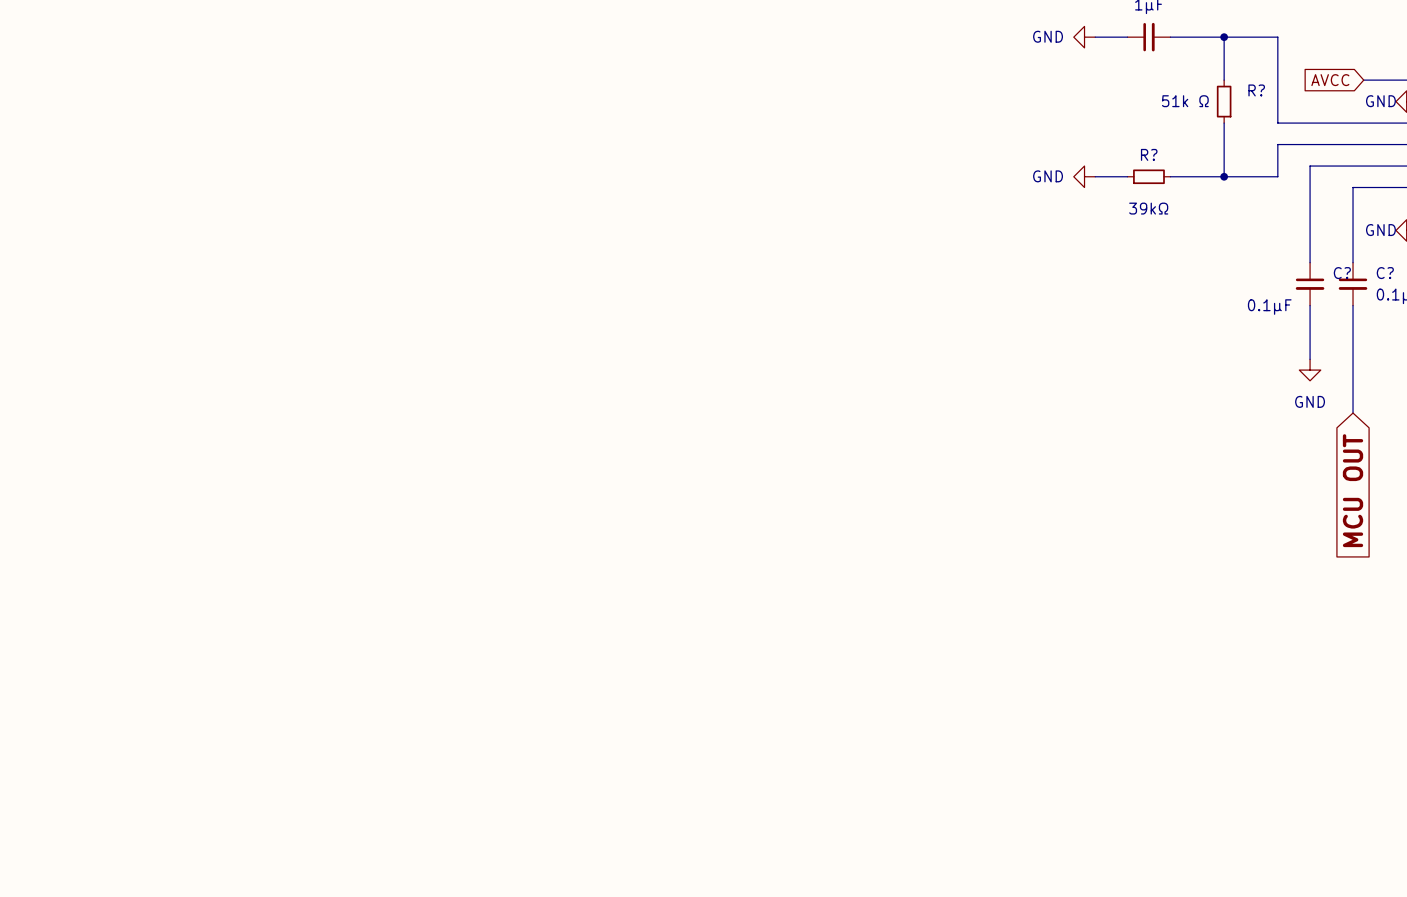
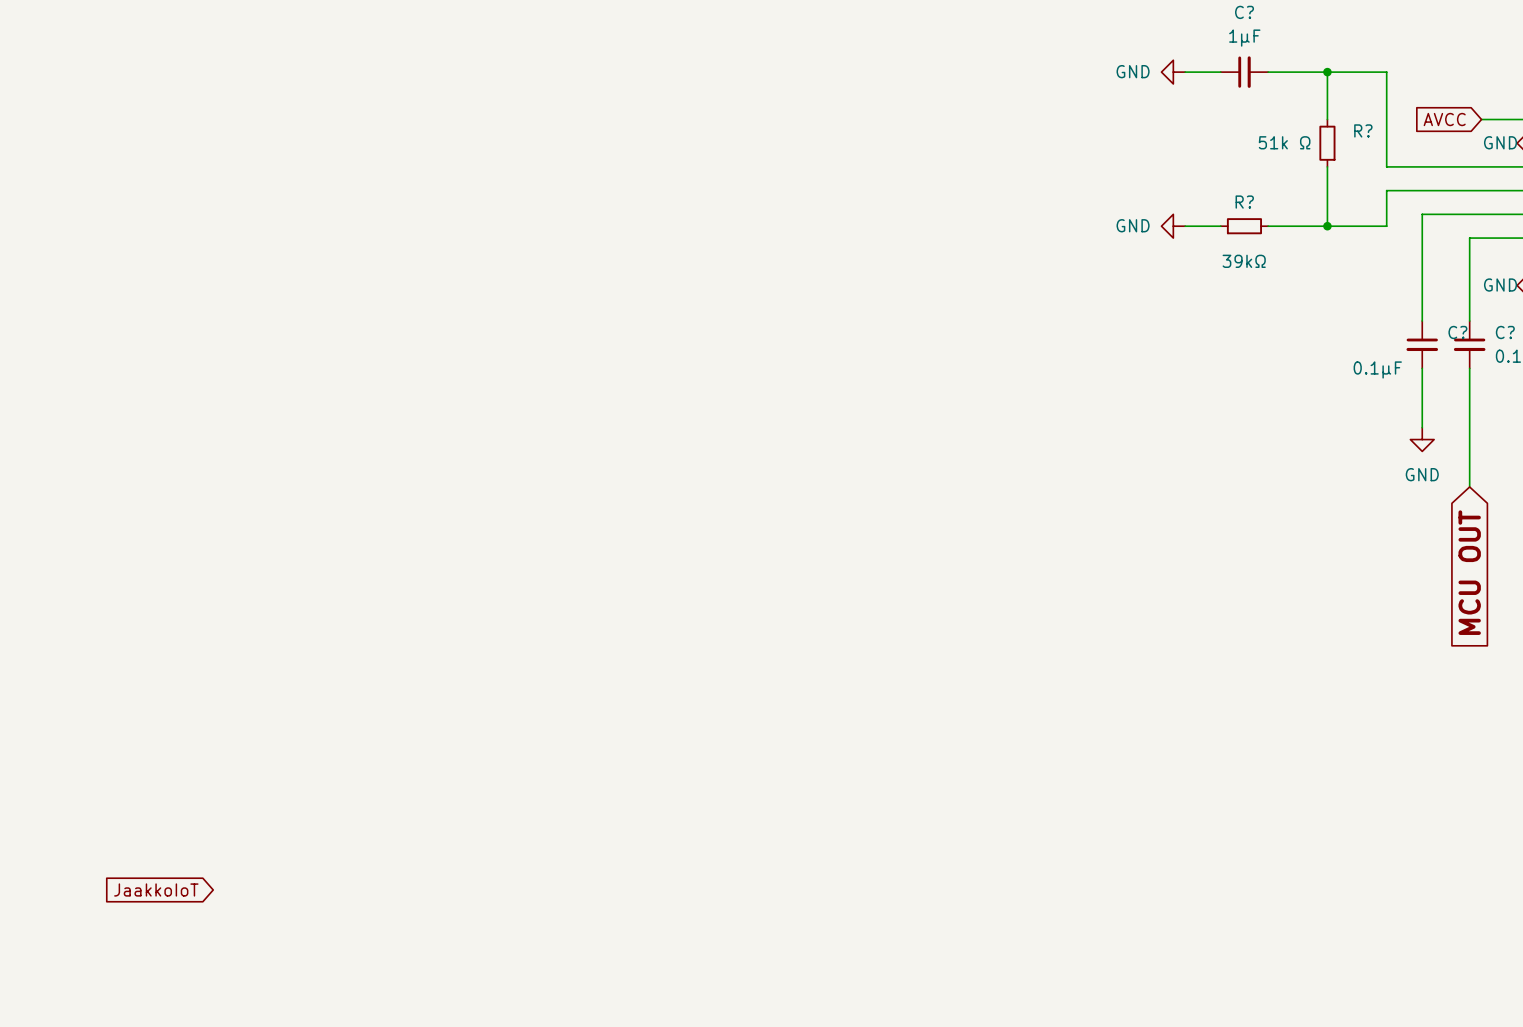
global label: none -> JaakkoIoT (156, 889)

